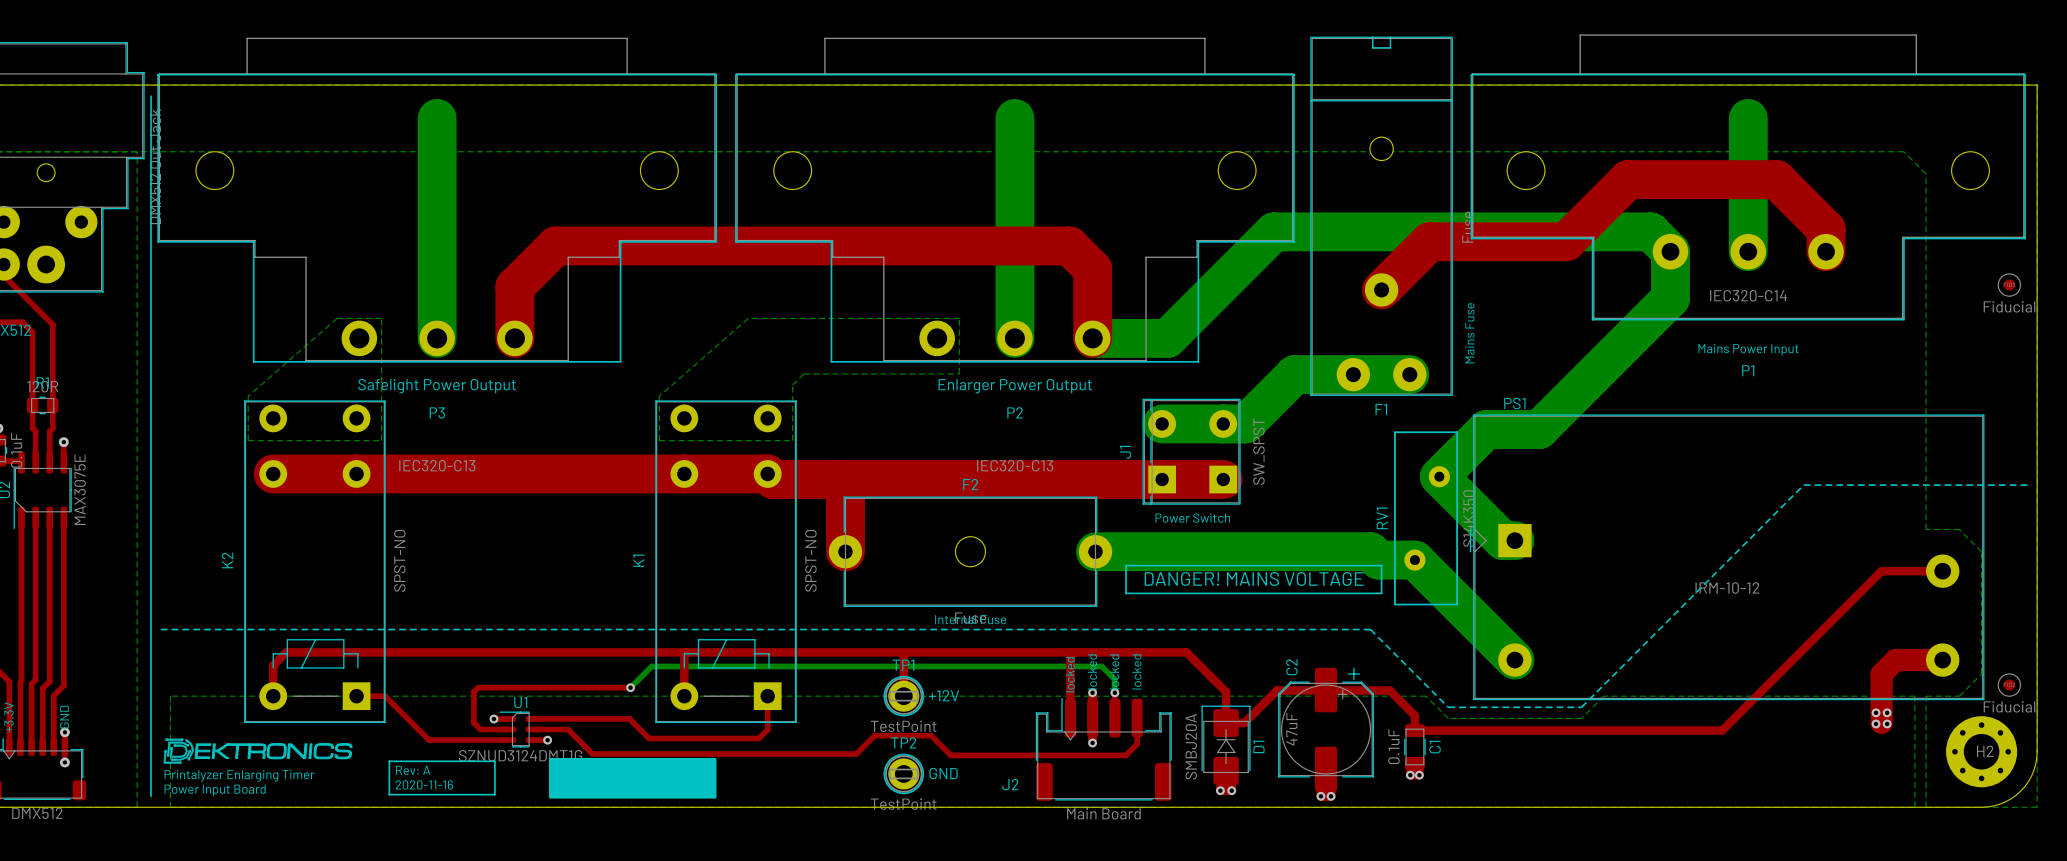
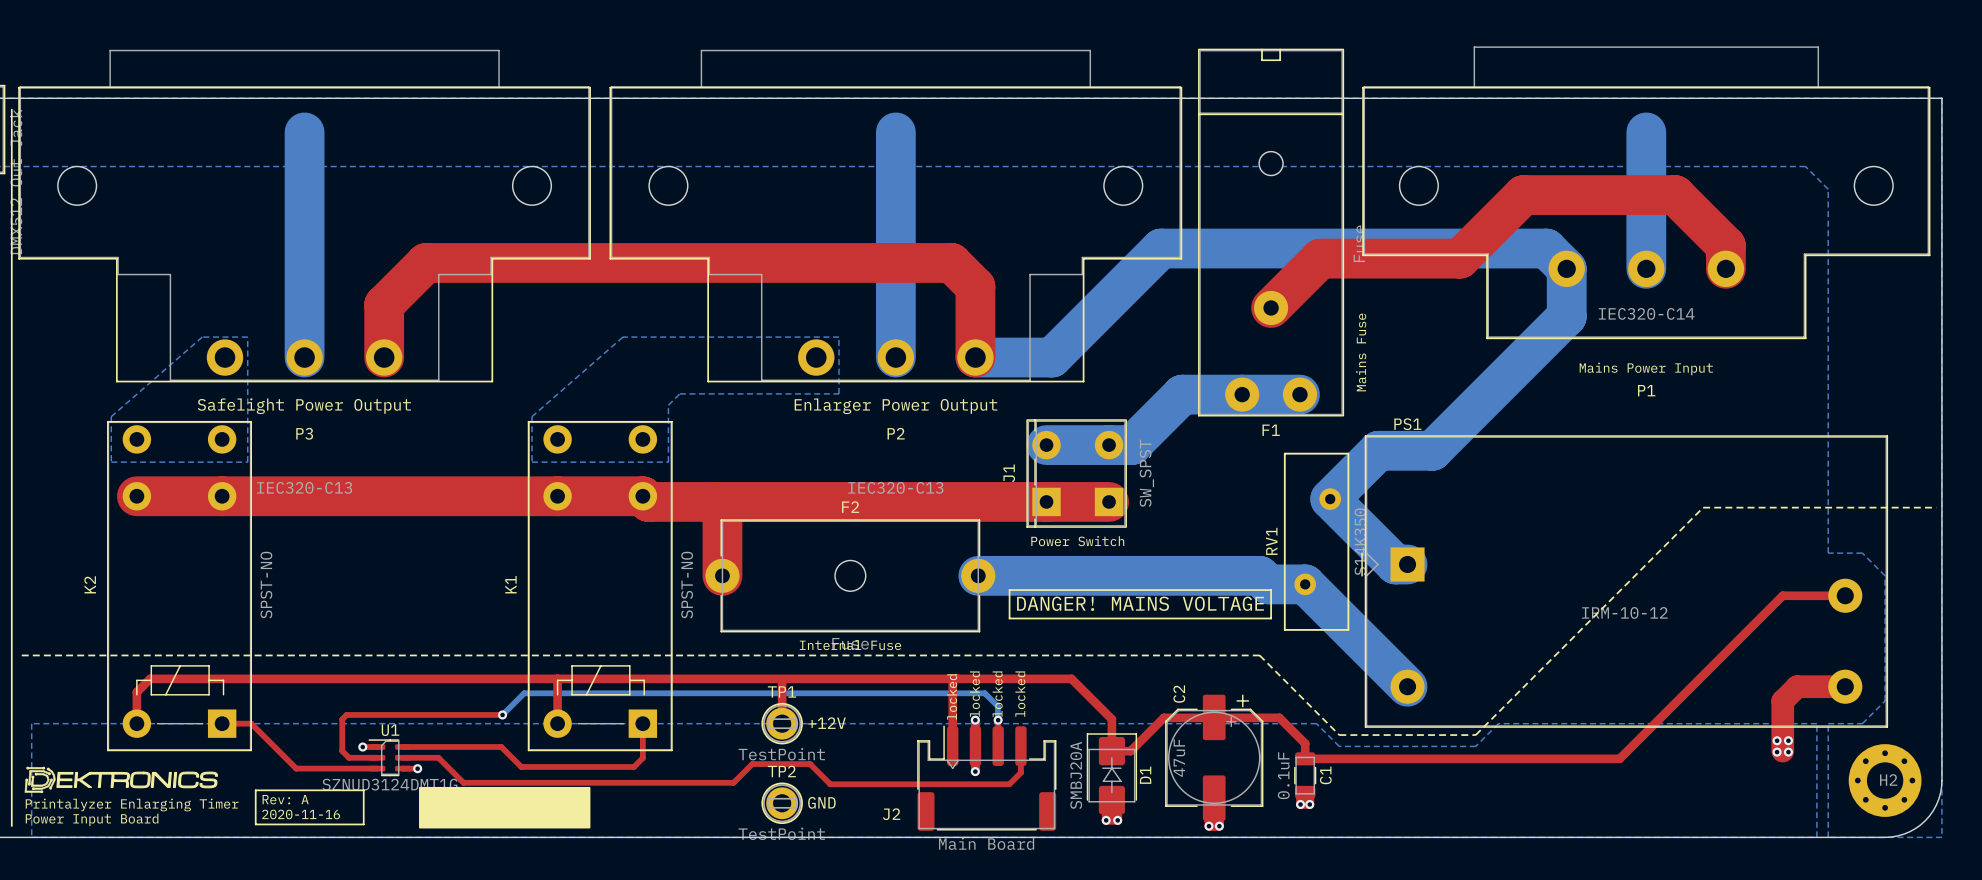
part: Fiducial (2009, 285) -> none
part: Fiducial (2009, 685) -> none

